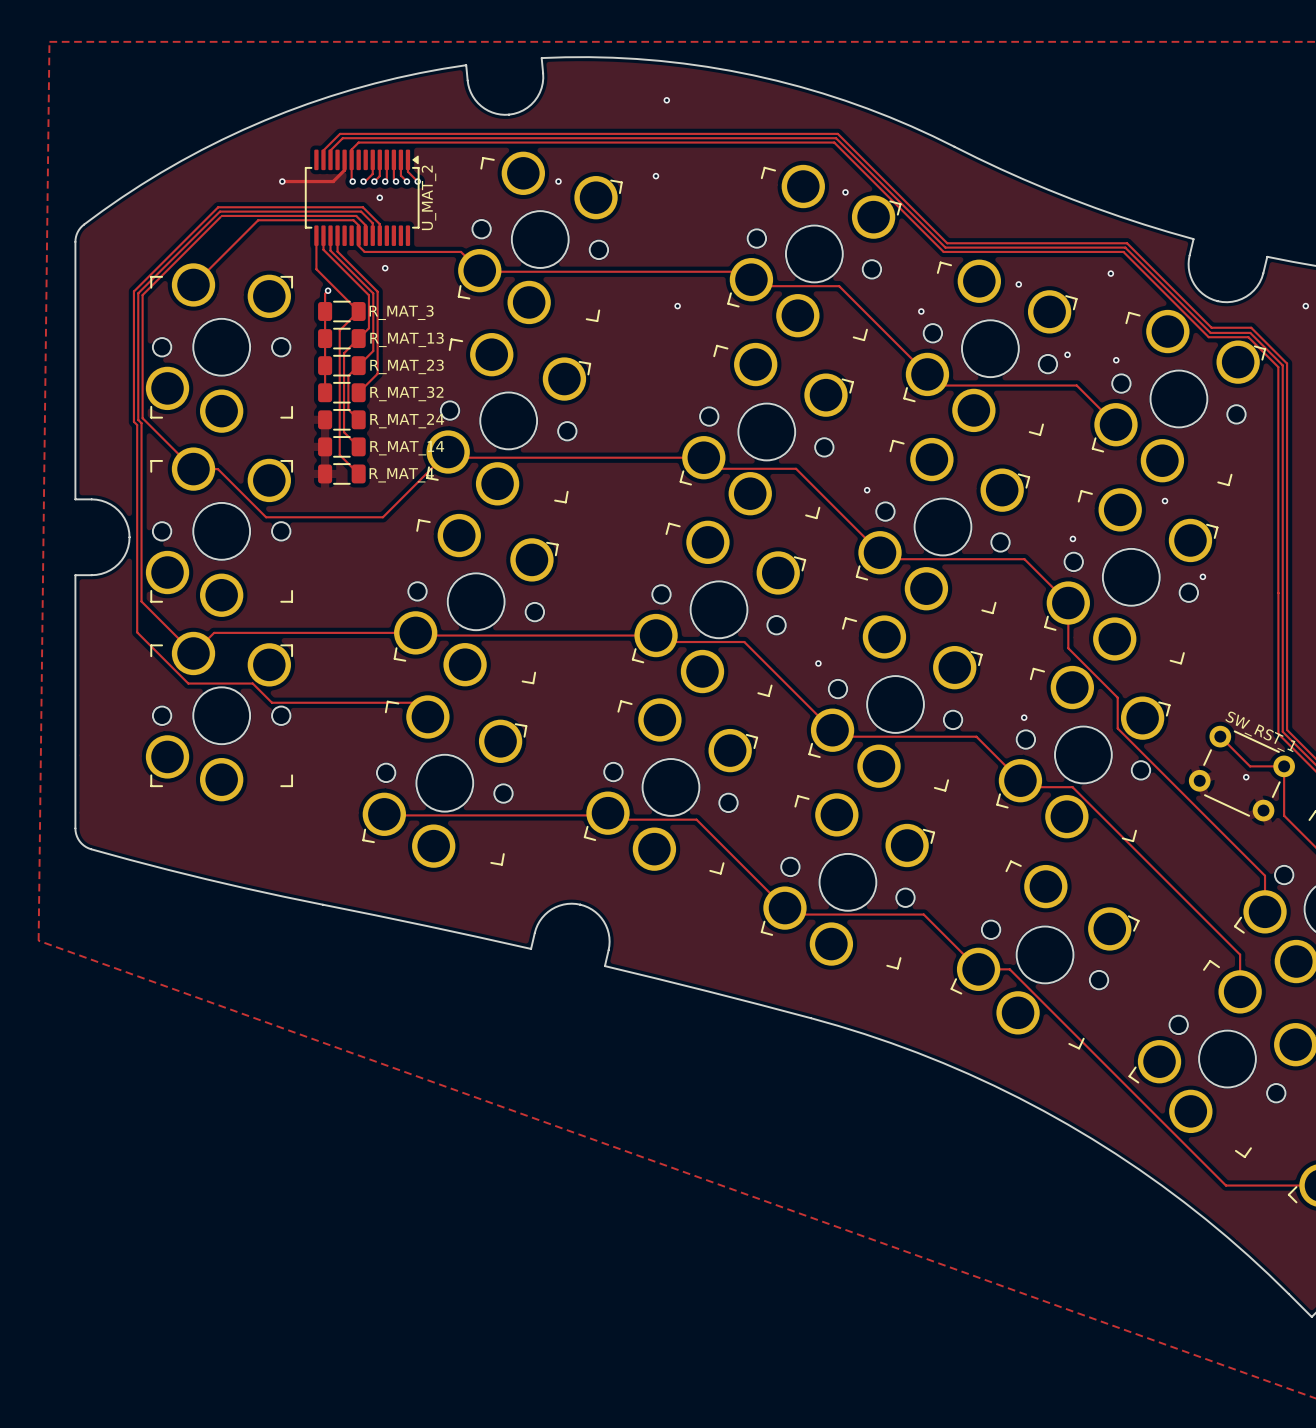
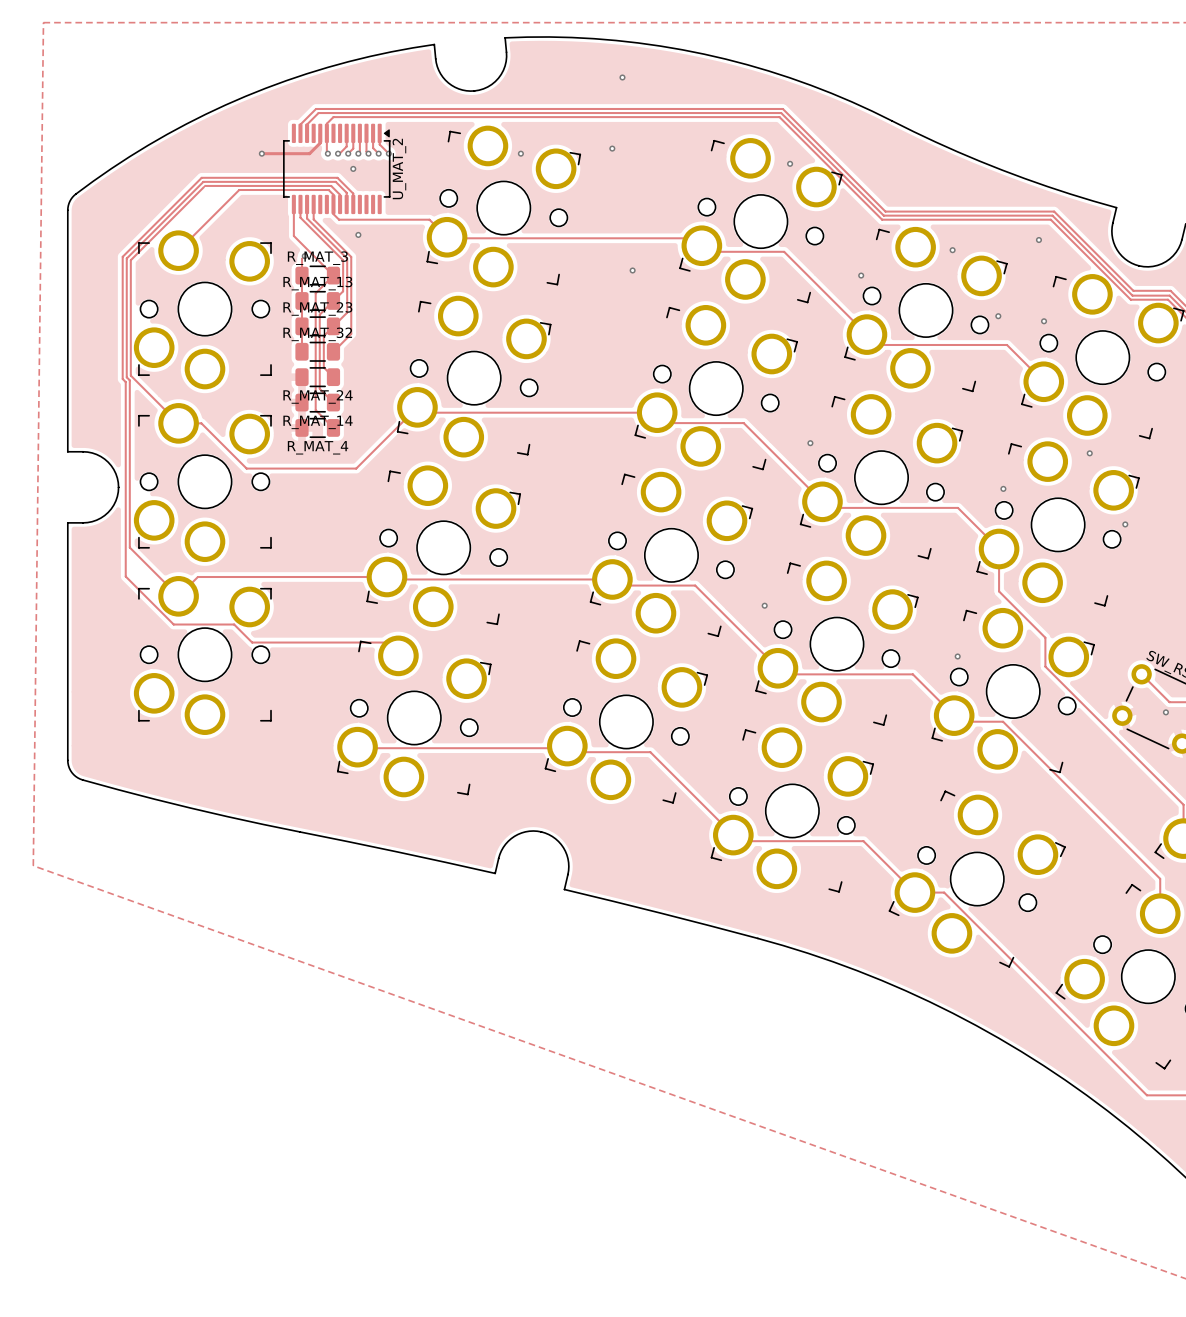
R_MAT_3 name position: R_MAT_3 (401, 312) -> R_MAT_3 (317, 258)
R_MAT_13 name position: R_MAT_13 (407, 339) -> R_MAT_13 (317, 283)
R_MAT_23 name position: R_MAT_23 (407, 366) -> R_MAT_23 (317, 308)
R_MAT_32 name position: R_MAT_32 (406, 393) -> R_MAT_32 (317, 334)
R_MAT_24 name position: R_MAT_24 (407, 421) -> R_MAT_24 (318, 396)
R_MAT_14 name position: R_MAT_14 (407, 448) -> R_MAT_14 (318, 422)
R_MAT_4 name position: R_MAT_4 (401, 475) -> R_MAT_4 (318, 447)

